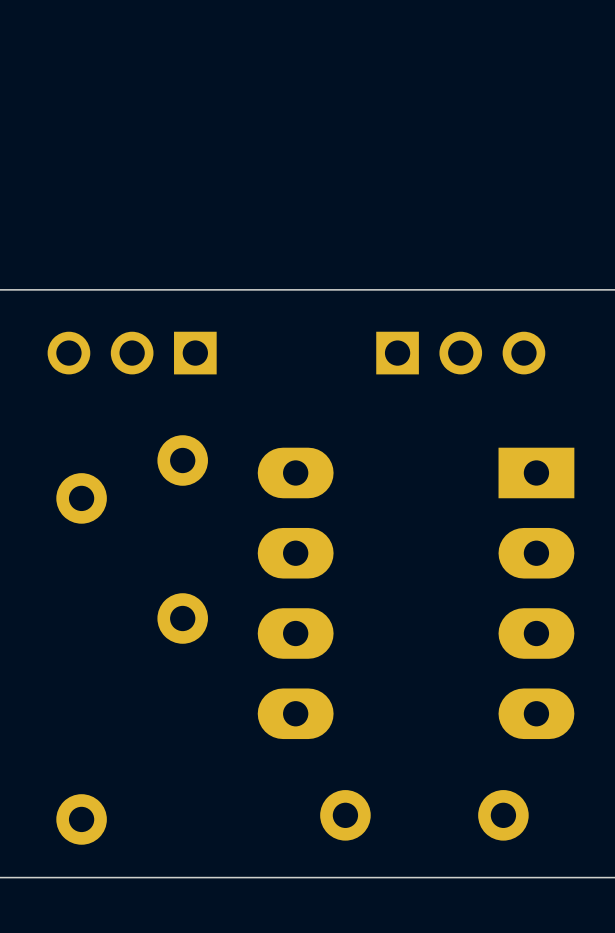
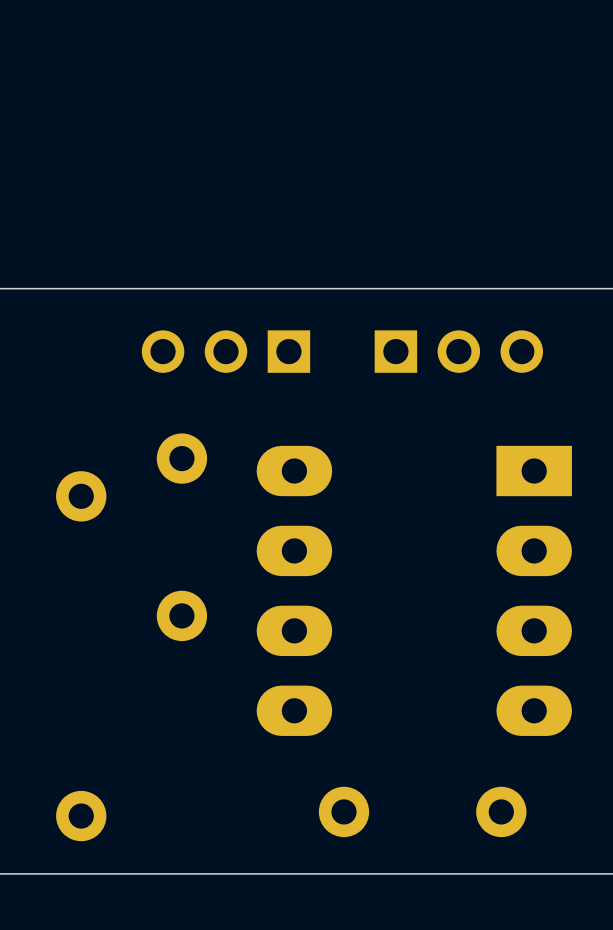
part position: (132, 353) -> (225, 351)

